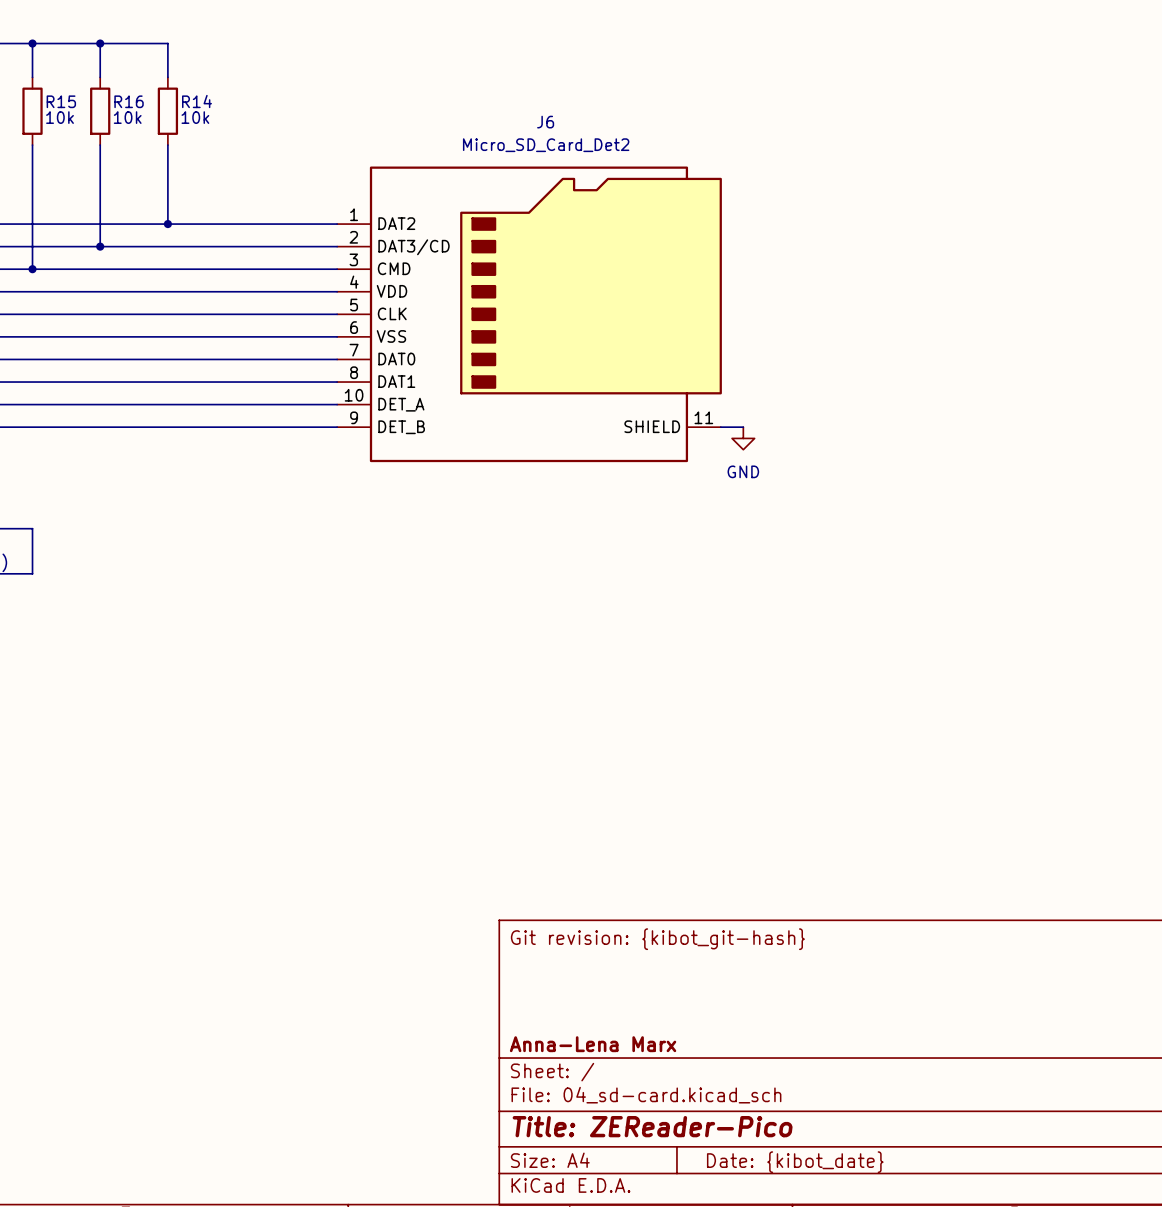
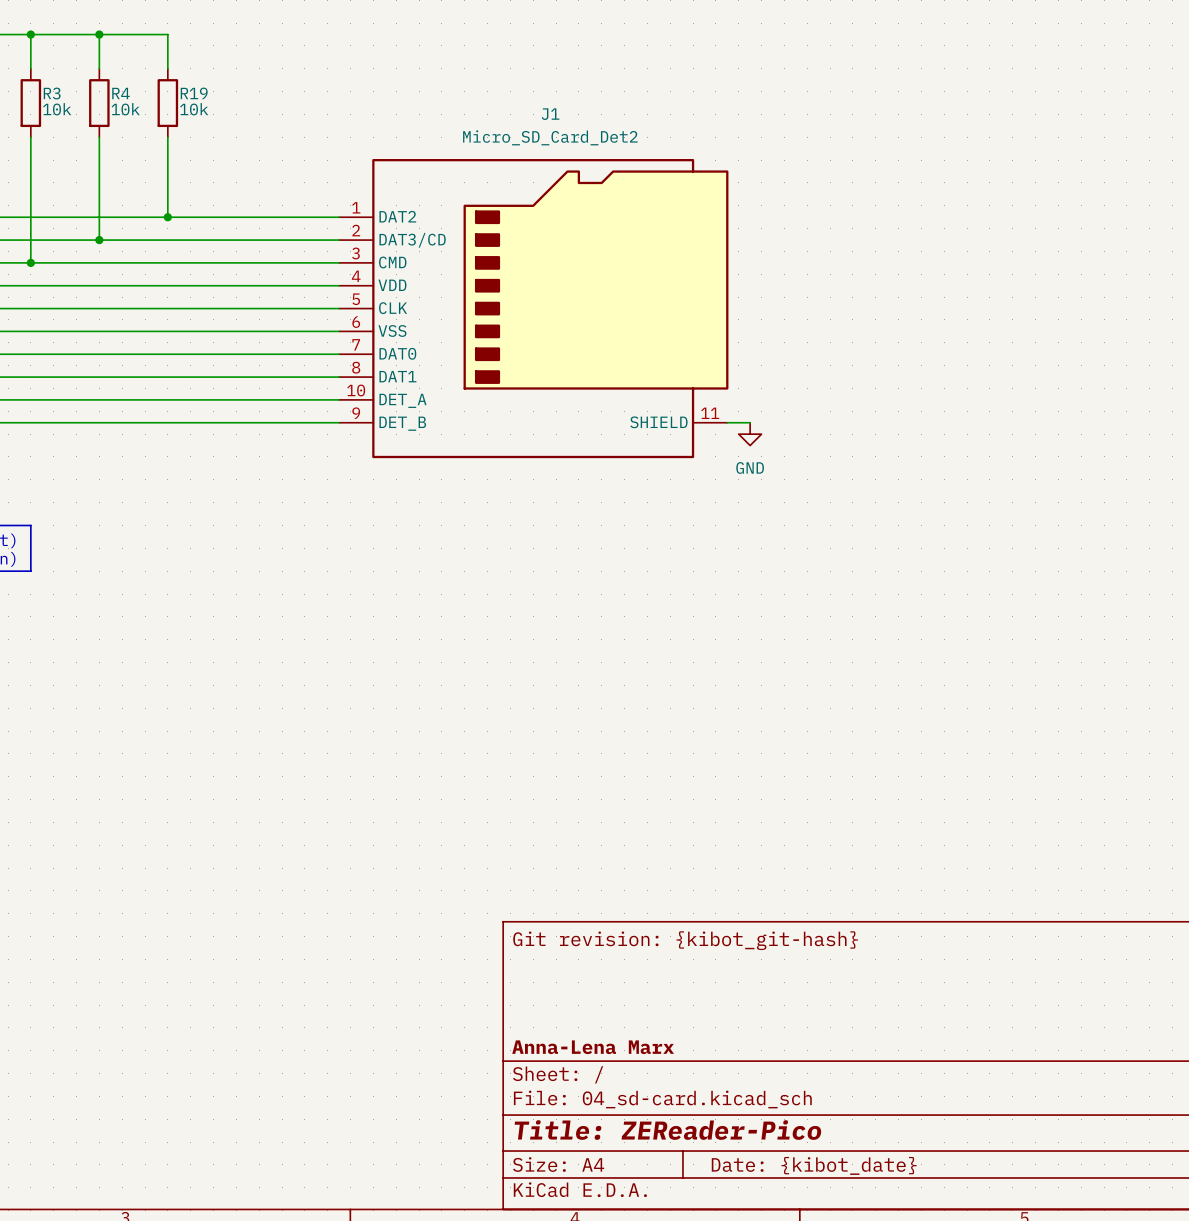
R15 name: R15 (61, 101) -> R3 (52, 93)
R16 name: R16 (129, 101) -> R4 (121, 93)
R14 name: R14 (197, 101) -> R19 (194, 93)
J6 name: J6 (545, 122) -> J1 (550, 114)

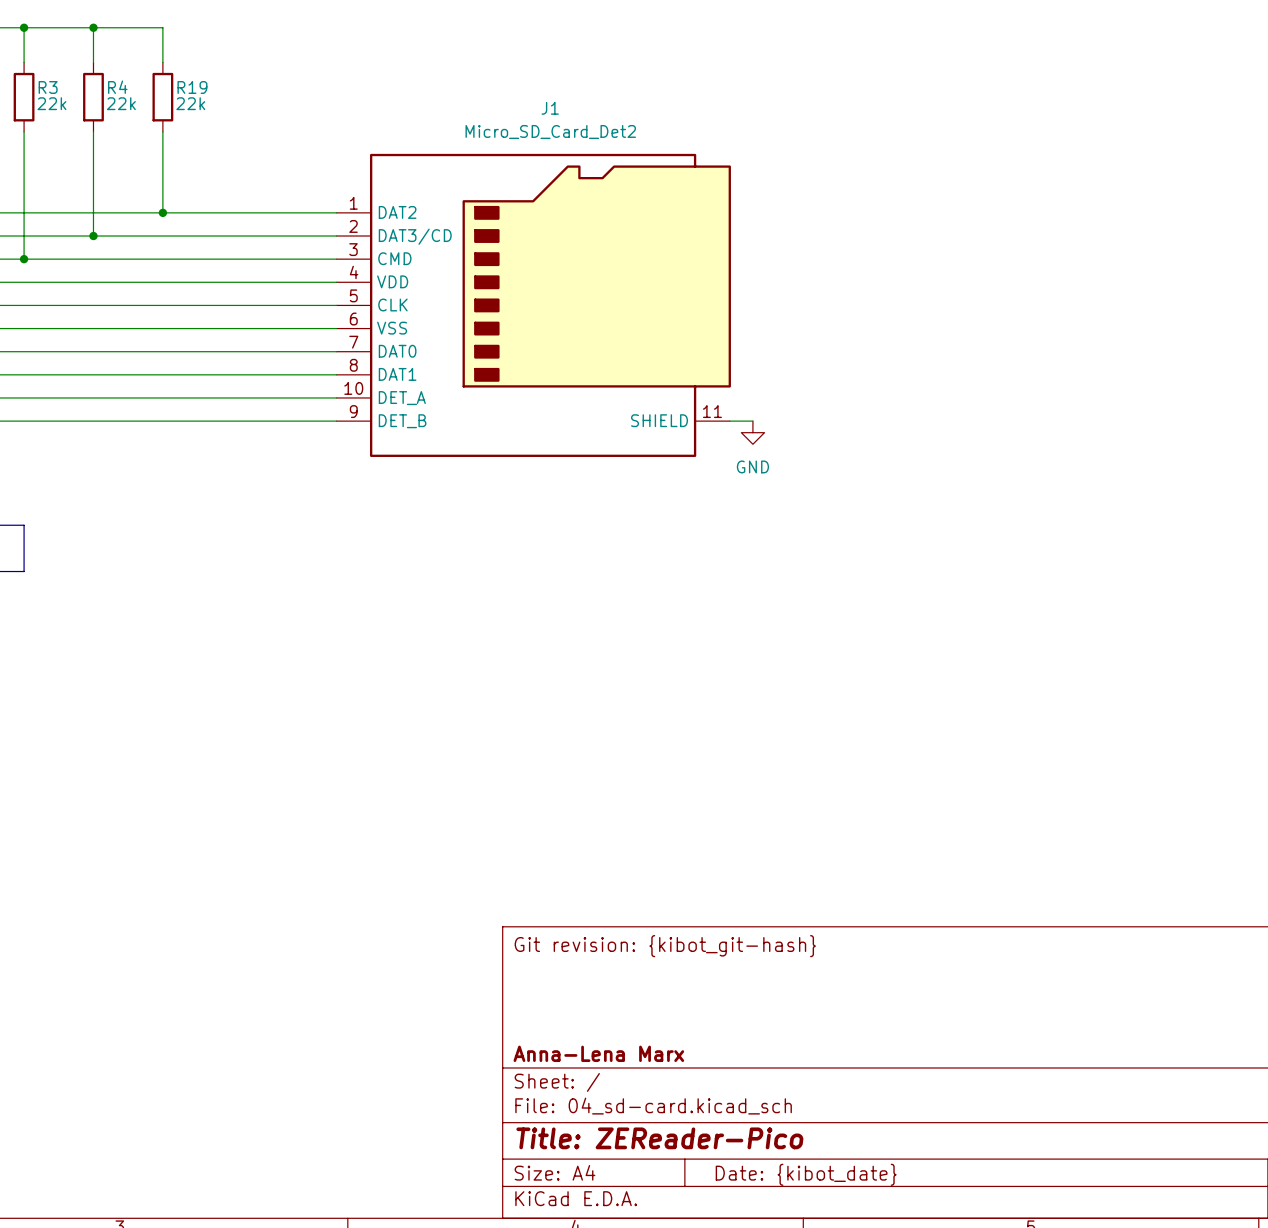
R3 value: 10k (57, 109) -> 22k (51, 103)
R4 value: 10k (125, 109) -> 22k (121, 103)
R19 value: 10k (194, 109) -> 22k (190, 103)

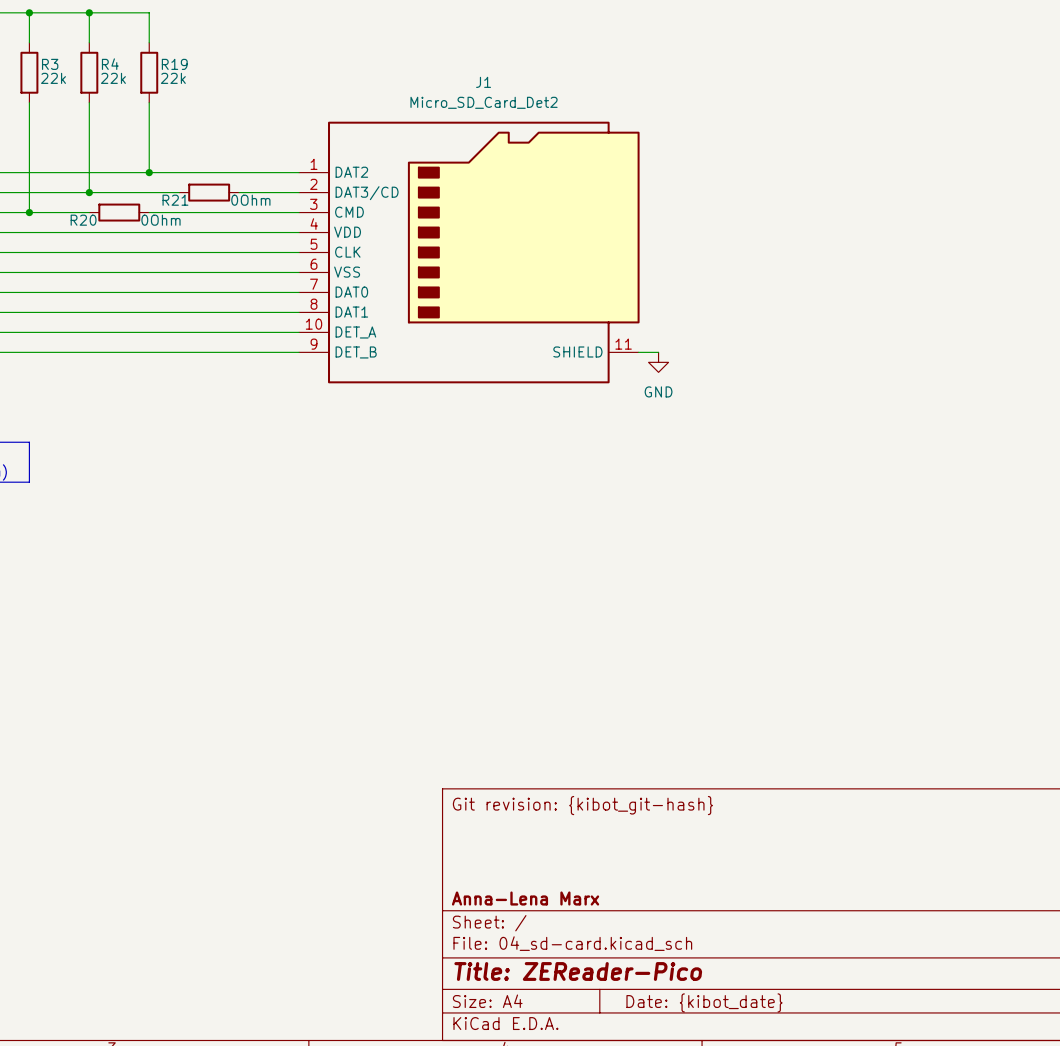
wire: (197, 236) (267, 236) -> none
R21: none -> 0Ohm (209, 192)
wire: (93, 259) (162, 259) -> none
R20: none -> 0Ohm (119, 212)

